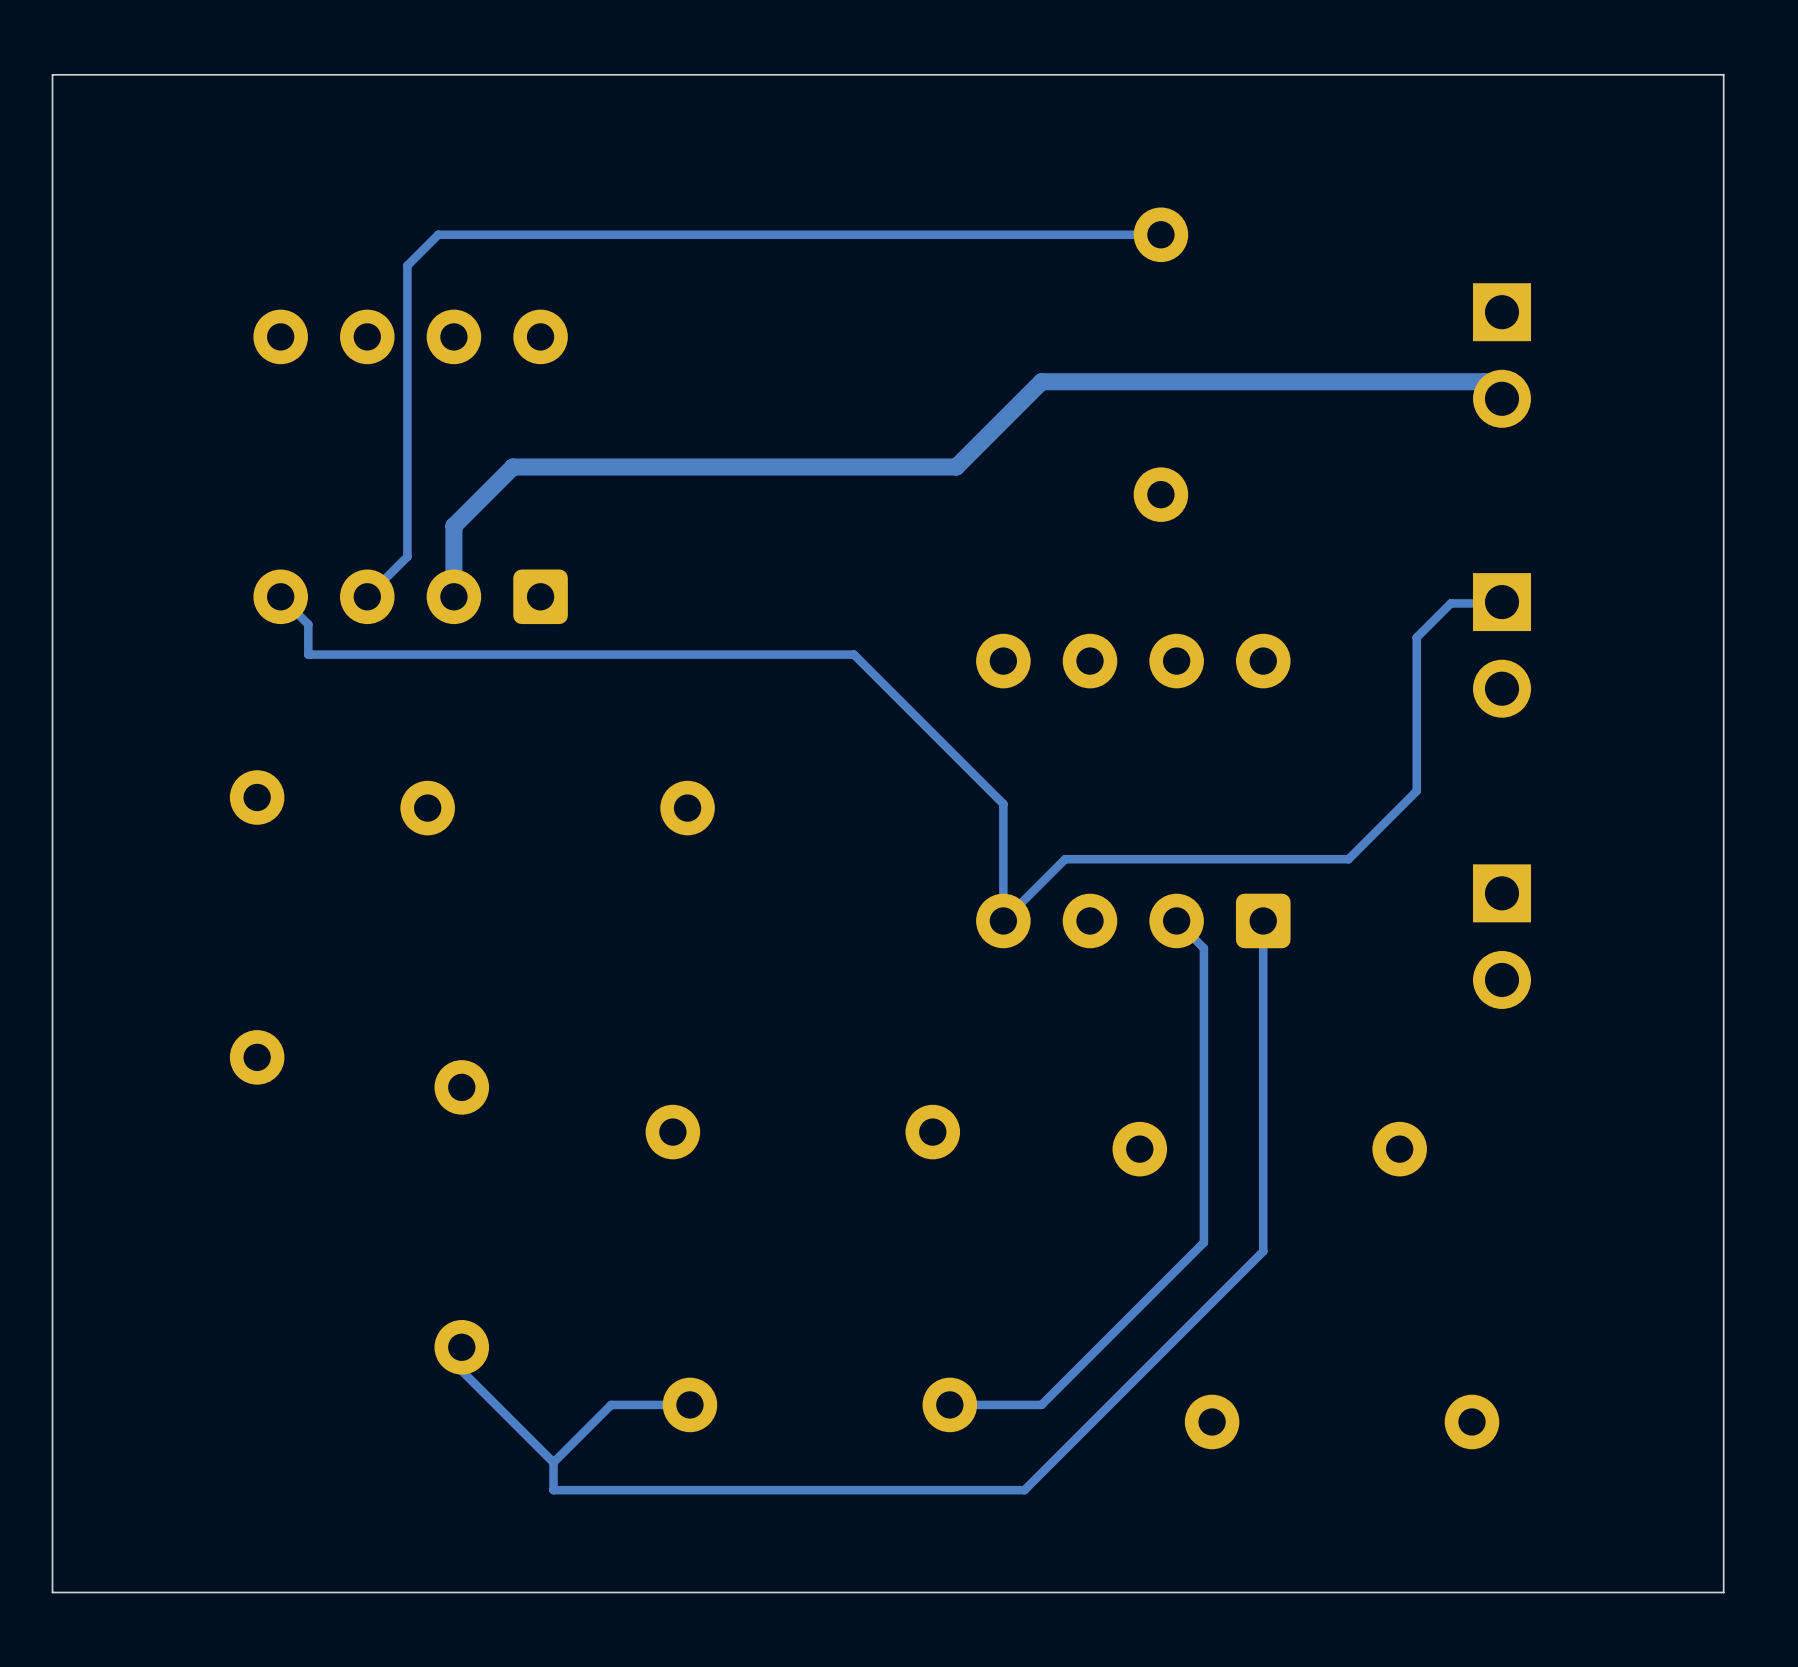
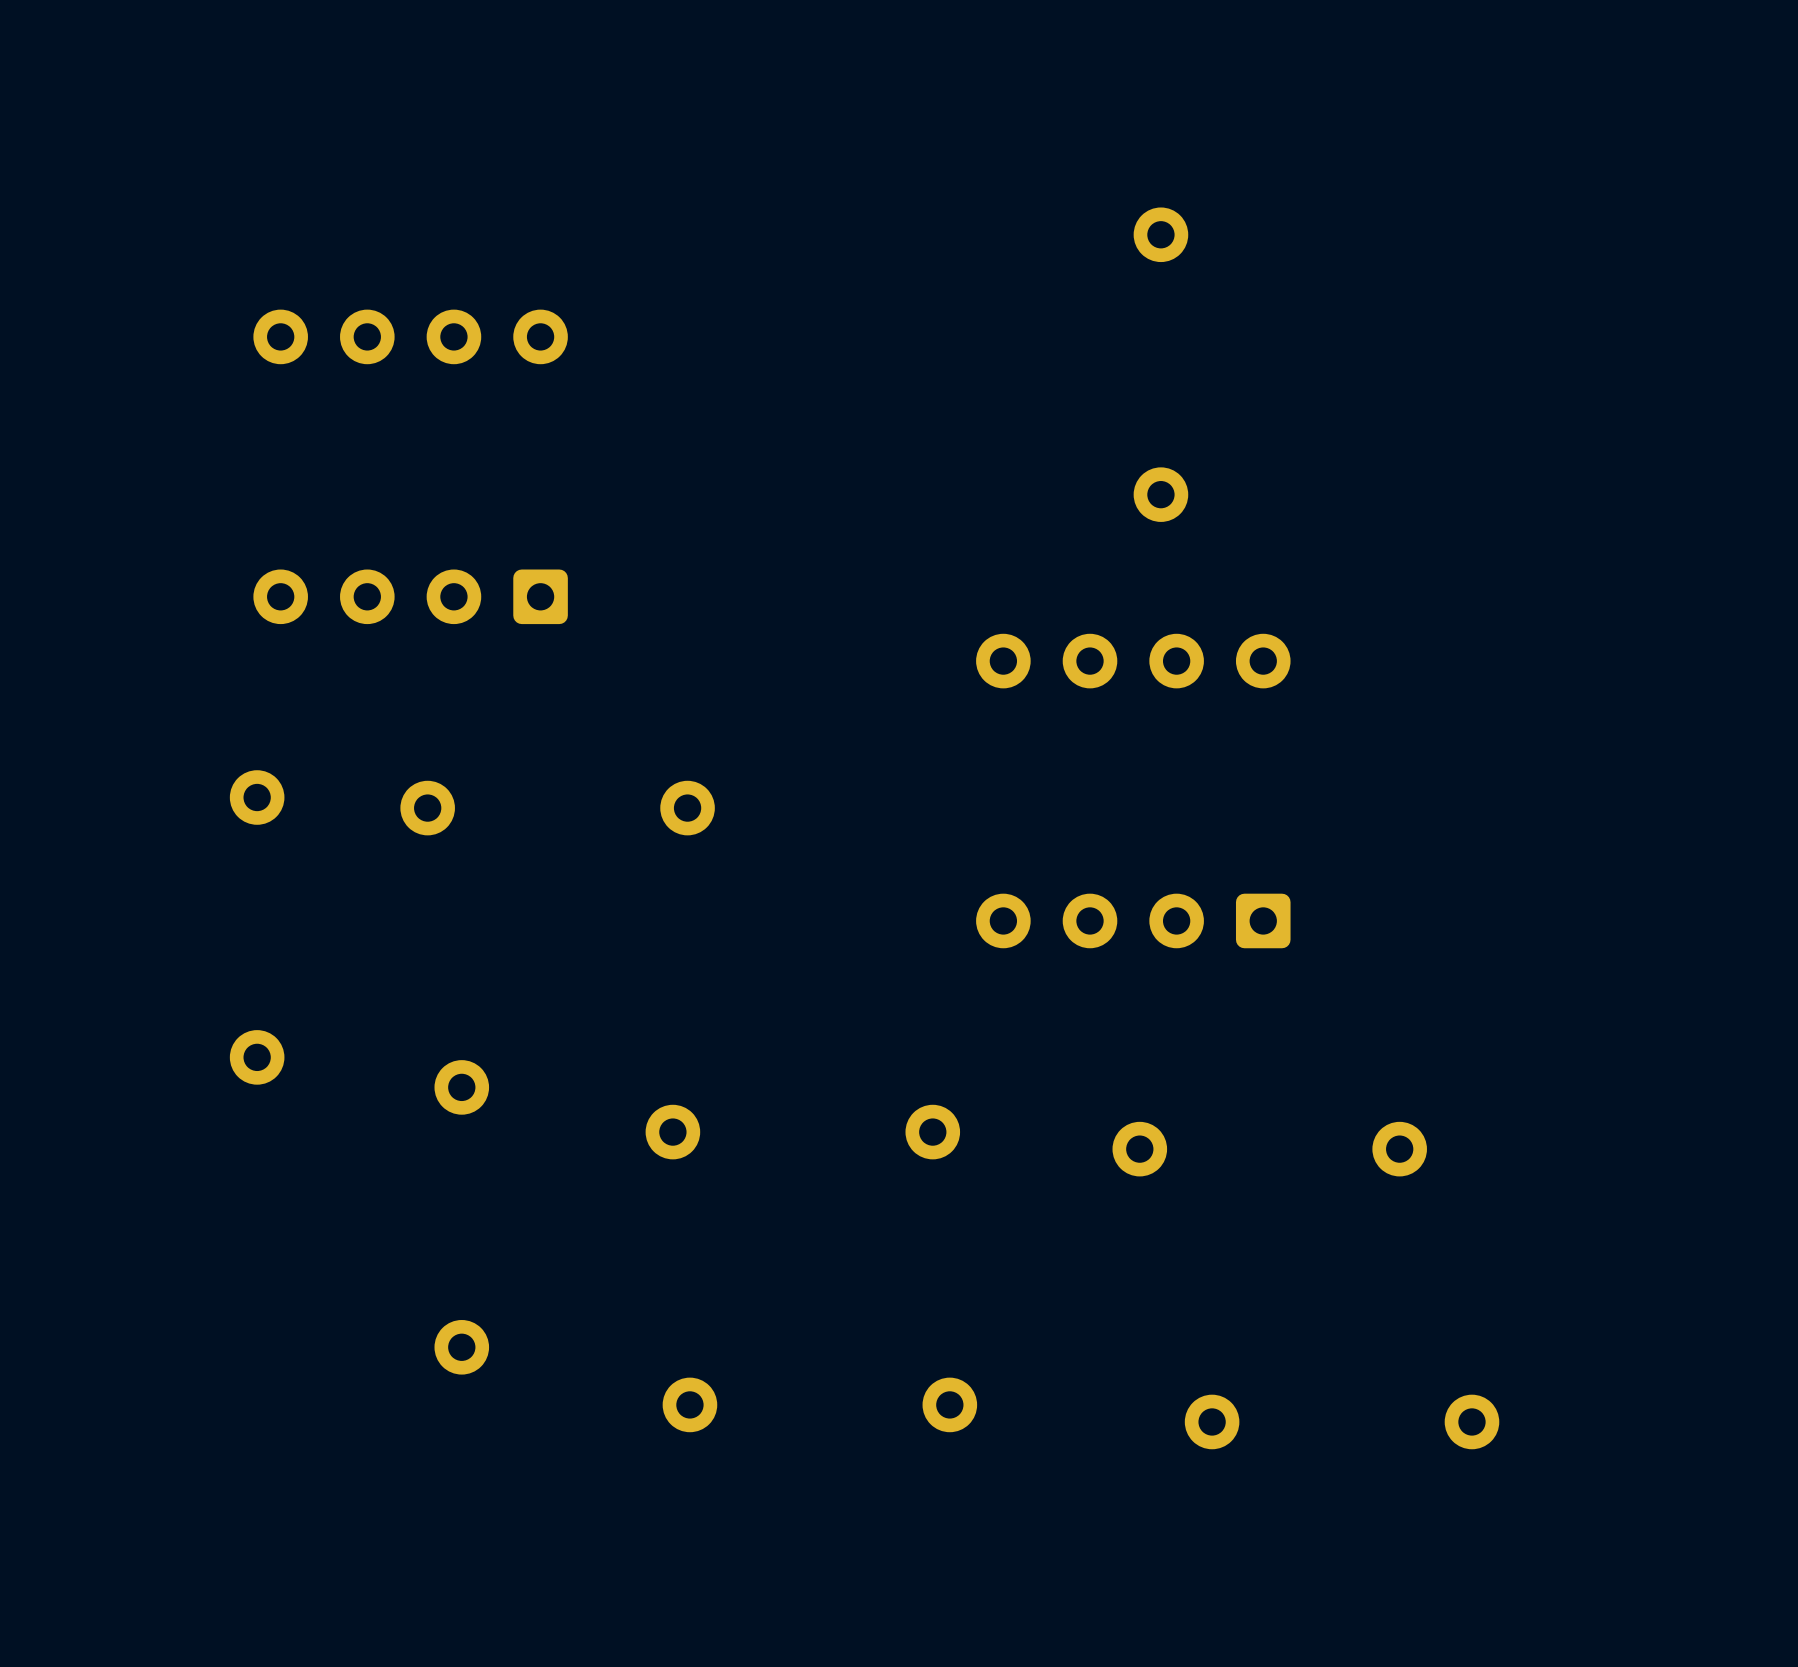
board edge: (1723, 74) (52, 74) (52, 1592) (1723, 1592) (1723, 74) -> none
track: (1143, 234) (438, 234) (407, 265) (407, 556) (367, 596) -> none
part: (1502, 355) -> none
track: (1502, 398) (1484, 381) (1041, 381) (956, 467) (512, 467) (453, 526) (453, 596) -> none
track: (280, 596) (308, 624) (308, 654) (853, 654) (1003, 803) (1003, 920) (1065, 859) (1348, 859) (1416, 791) (1416, 637) (1450, 603) (1502, 602) -> none
part: (1502, 645) -> none
track: (1176, 920) (1203, 948) (1203, 1242) (1041, 1404) (949, 1404) -> none
track: (1263, 920) (1263, 1251) (1024, 1490) (553, 1490) (553, 1462) -> none
part: (1502, 936) -> none
track: (461, 1347) (461, 1370) (553, 1462) -> none
track: (689, 1404) (611, 1404) (553, 1462) -> none

